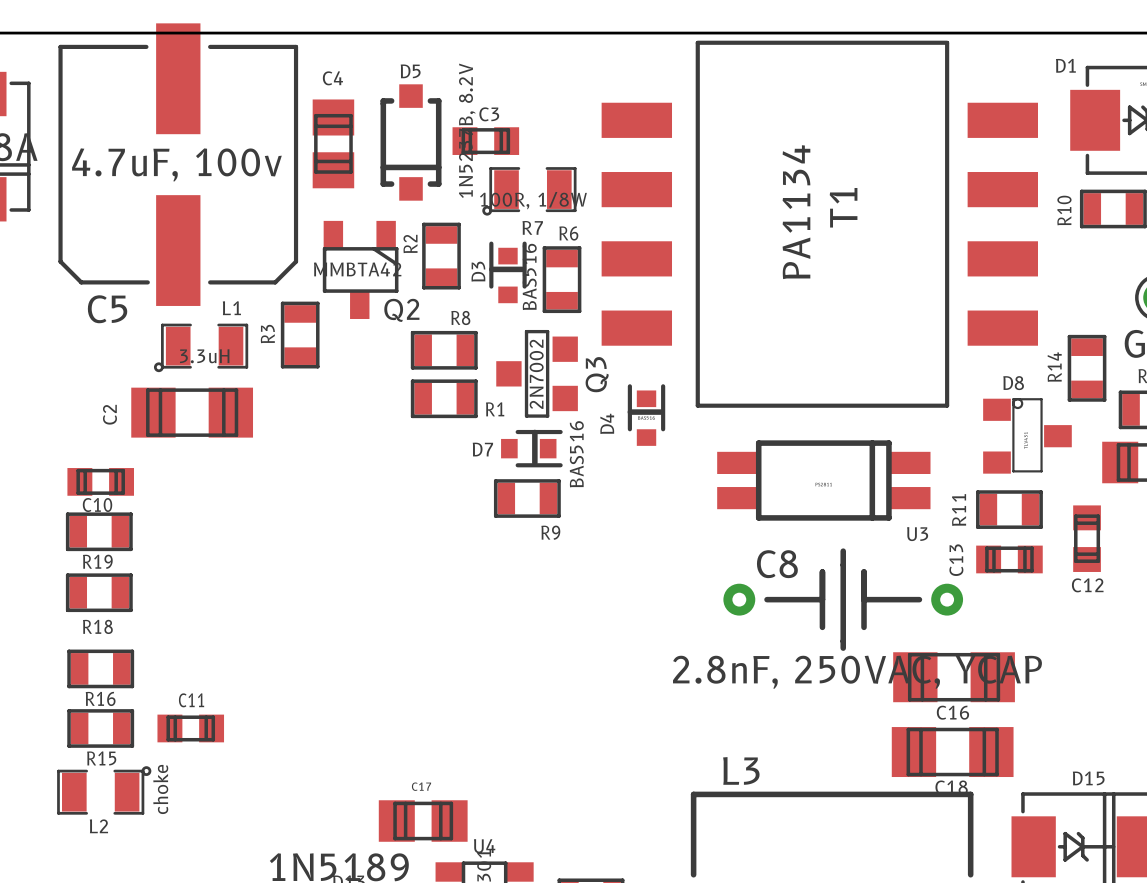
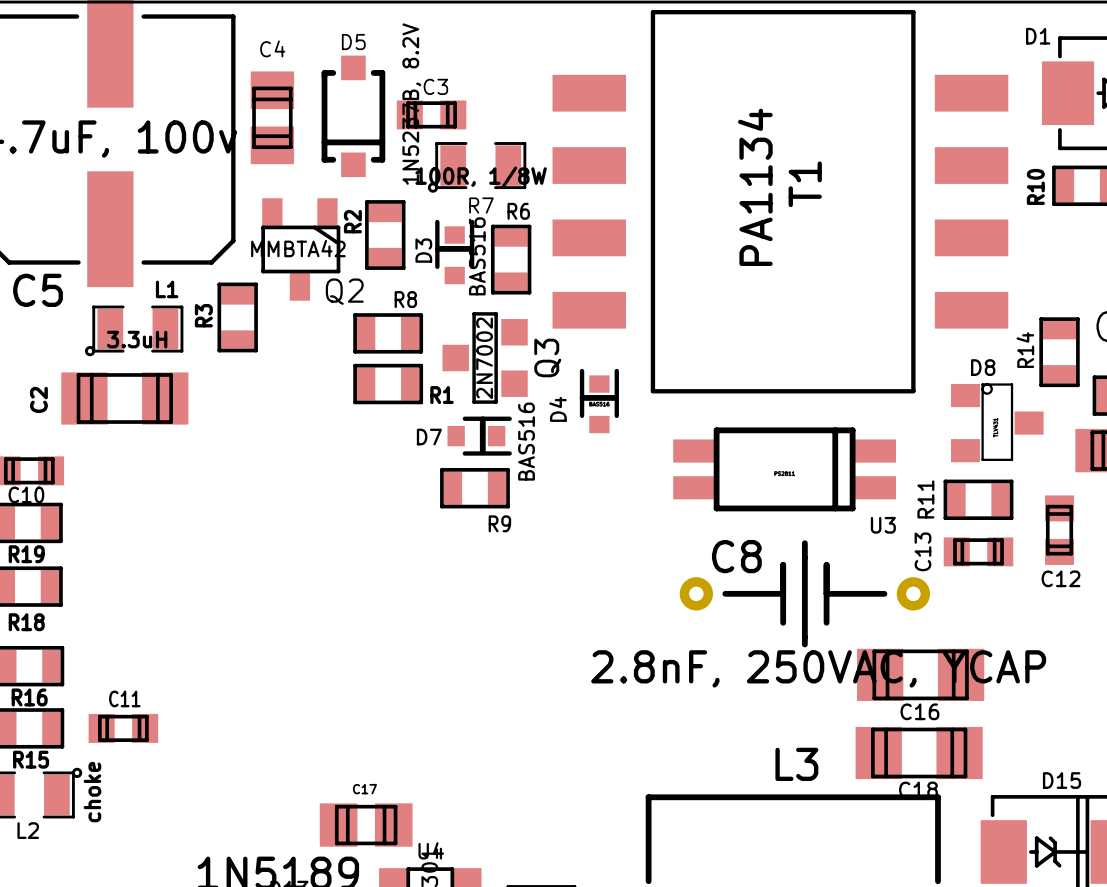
L3 name position: L3 (741, 770) -> L3 (796, 764)

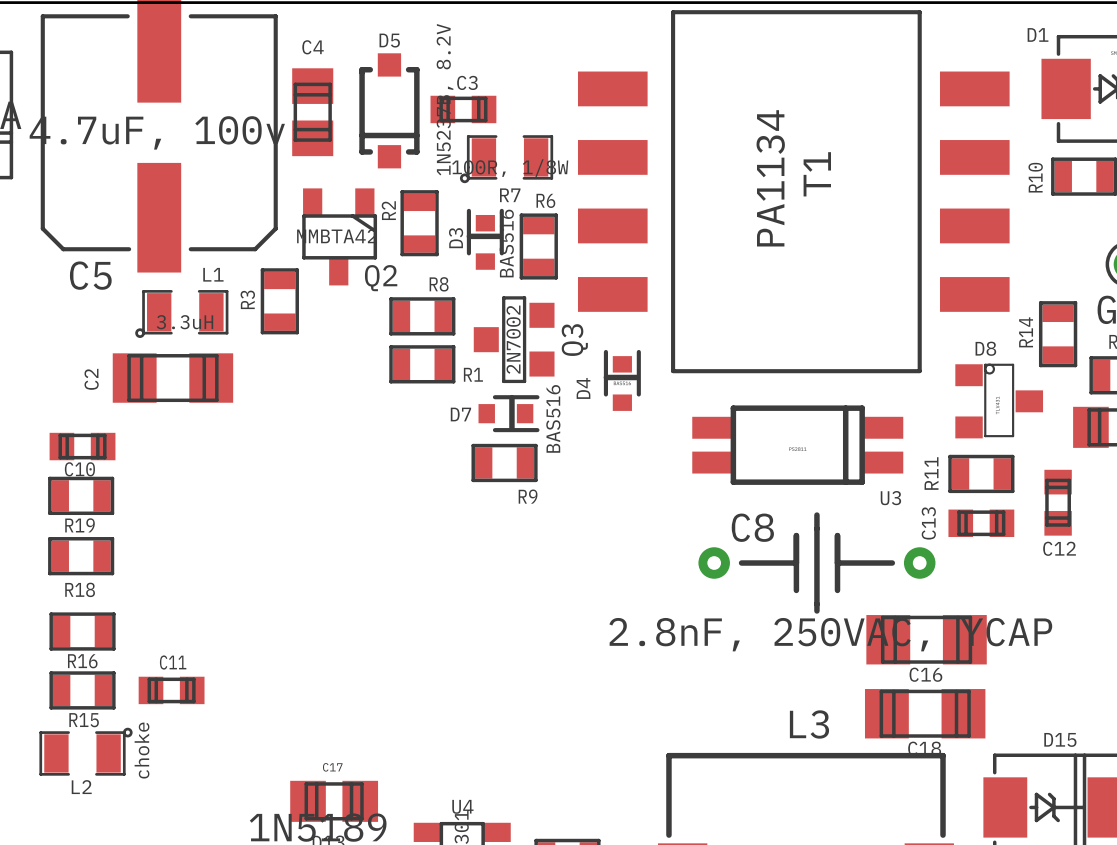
C17 position: (366, 825) -> (334, 801)

